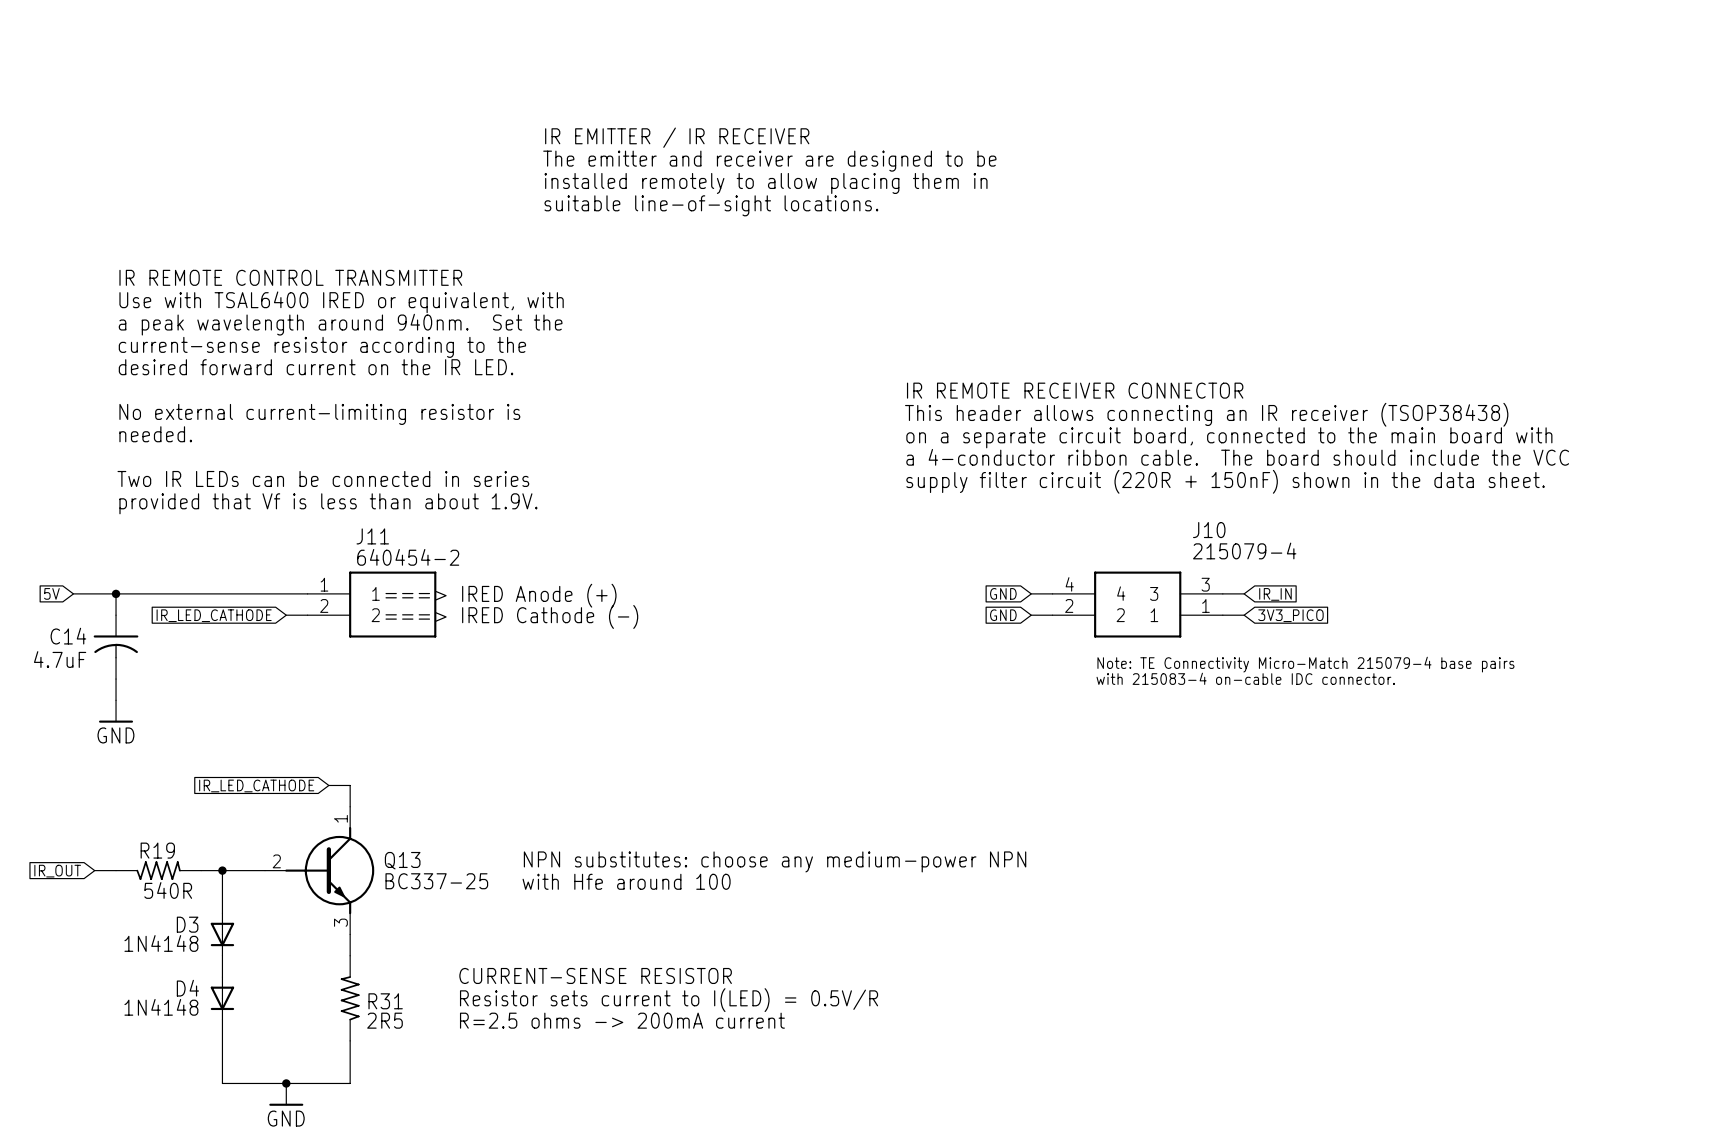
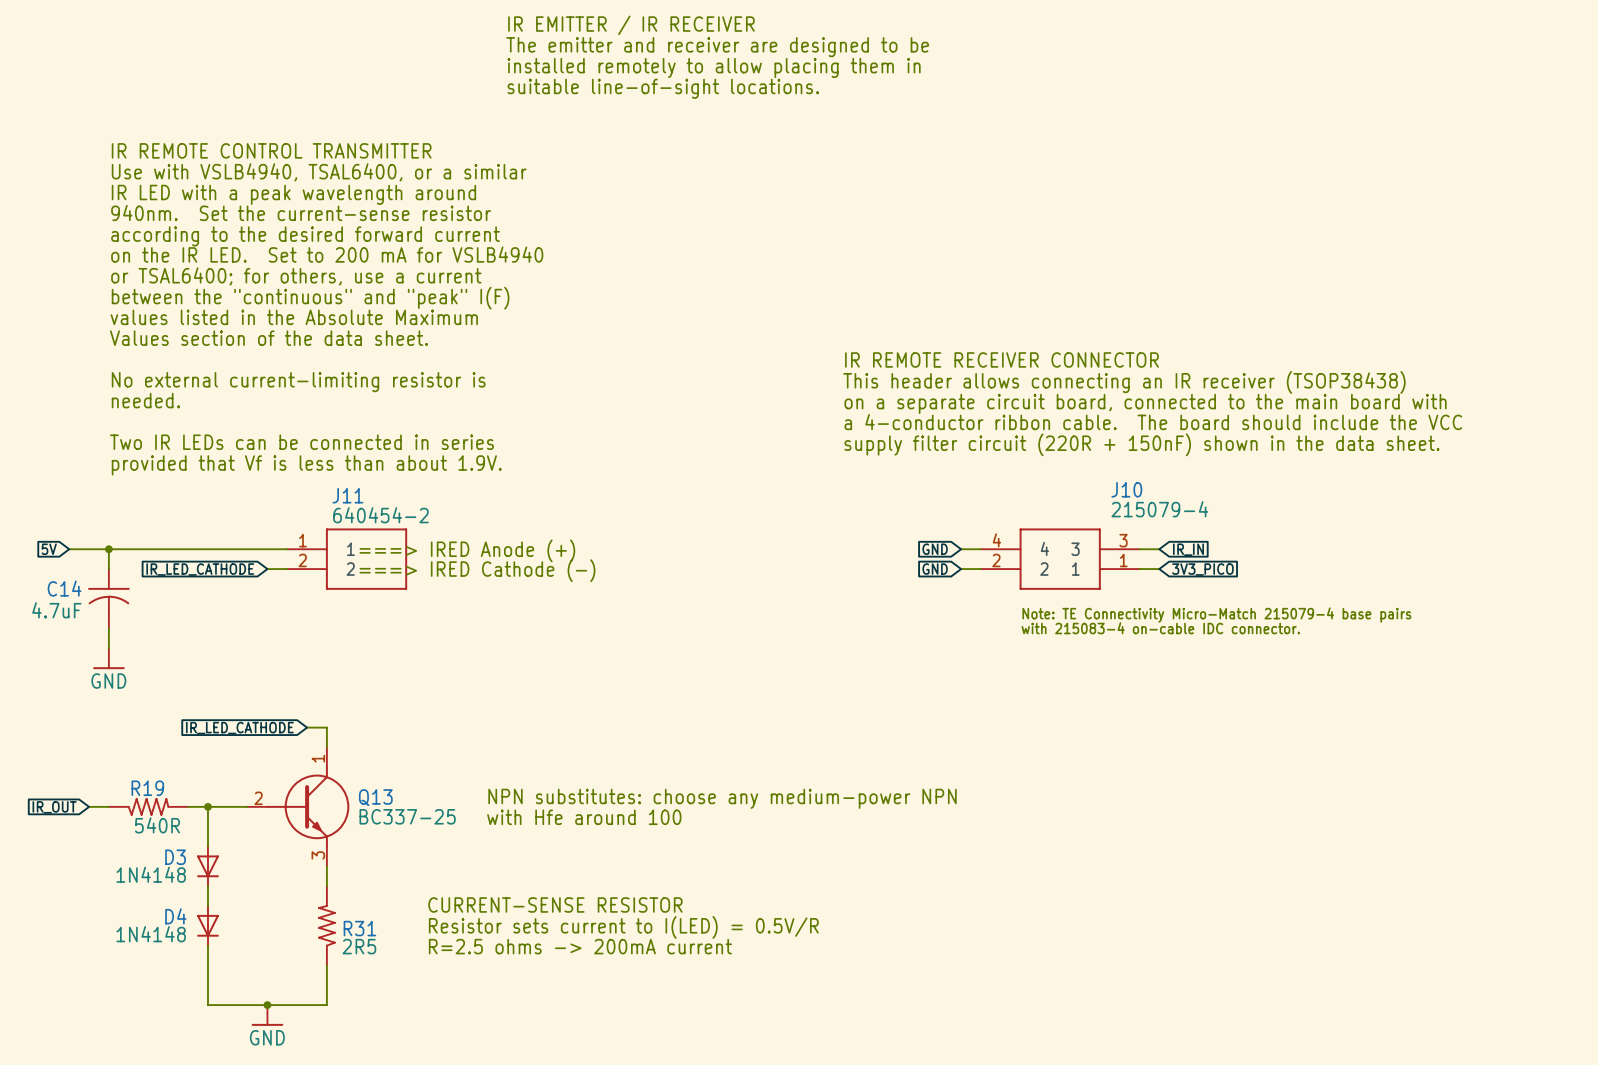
text position: IR EMITTER / IR RECEIVER (677, 137) -> IR EMITTER / IR RECEIVER (631, 25)
text position: The emitter and receiver are designed to be (769, 161) -> The emitter and receiver are designed to be (717, 47)
text: none -> IR REMOTE CONTROL TRANSMITTER (271, 150)
text position: installed remotely to allow placing them in (765, 183) -> installed remotely to allow placing them in (714, 67)
text: none -> Use with VSLB4940, TSAL6400, or a similar (319, 172)
text position: suitable line-of-sight locations. (711, 205) -> suitable line-of-sight locations. (663, 88)
text: none -> IR LED with a peak wavelength around (293, 194)
text: none -> 940nm. Set the current-sense resistor (301, 212)
text: none -> according to the desired forward current (305, 236)
text: IR REMOTE CONTROL TRANSMITTER (290, 277) -> on the IR LED. Set to 200 mA for VSLB4940 (327, 254)
text: Use with TSAL6400 IRED or equivalent, with (341, 302) -> or TSAL6400; for others, use a current (296, 276)
text: a peak wavelength around 940nm. Set the (340, 324) -> between the "continuous" and "peak" I(F) (310, 298)
text: current-sense resistor according to the (322, 347) -> values listed in the Absolute Maximum (294, 317)
text: desired forward current on the IR LED. (316, 367) -> Values section of the data sheet. (268, 338)

